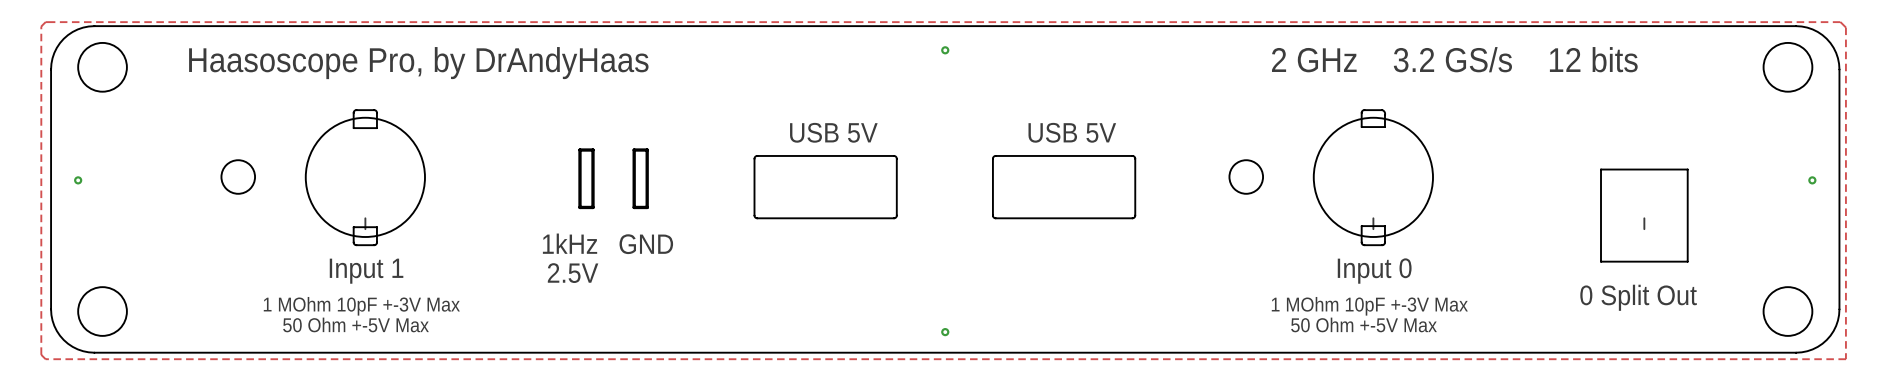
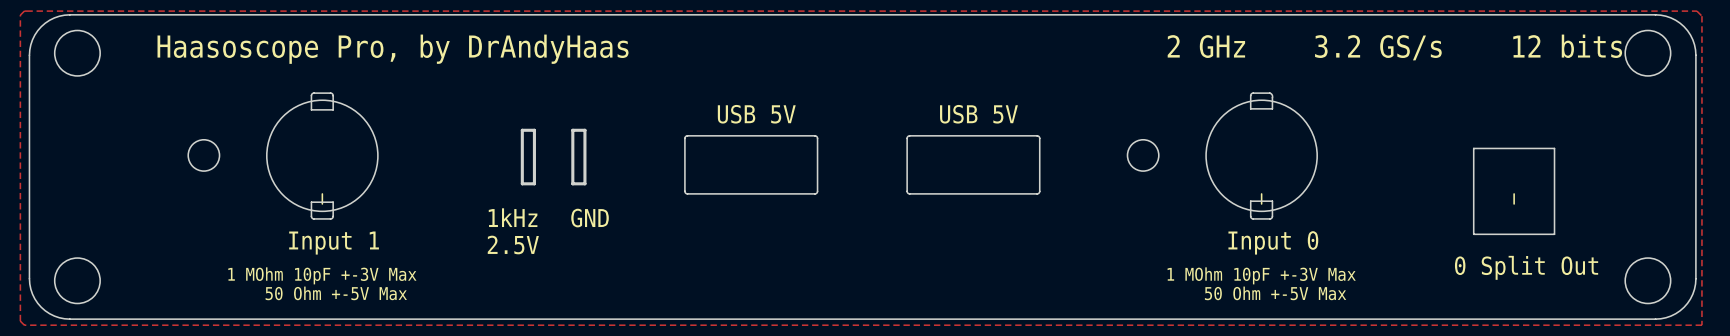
via: (945, 50) -> none
via: (78, 180) -> none
via: (1812, 180) -> none
via: (945, 332) -> none

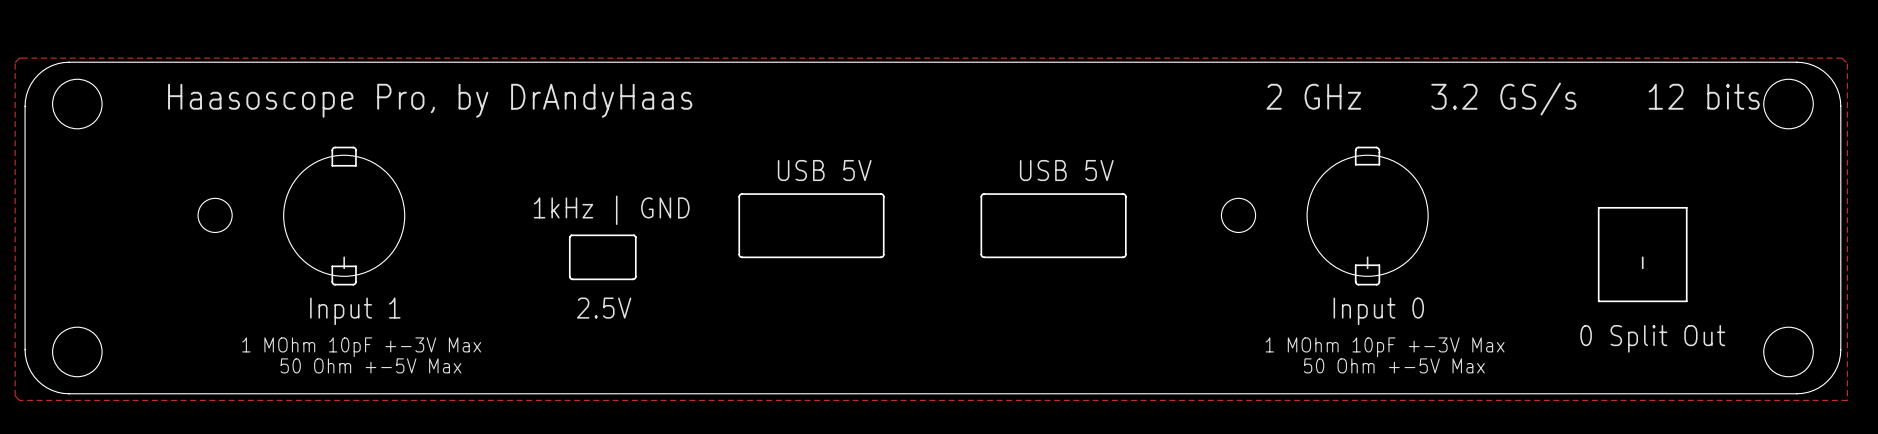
board edge: (522, 130) (534, 130) (534, 183) (522, 183) (522, 130) -> none
board edge: (572, 130) (584, 130) (584, 183) (572, 183) (572, 130) -> none
text: none -> 1kHz | GND (611, 210)
board edge: none -> (571, 235) (634, 235) (635, 237) (635, 277) (571, 278) (569, 237) (571, 235)
text: 1kHz (513, 217) -> none
text: GND (590, 218) -> none
text position: 2.5V (513, 244) -> 2.5V (604, 308)

